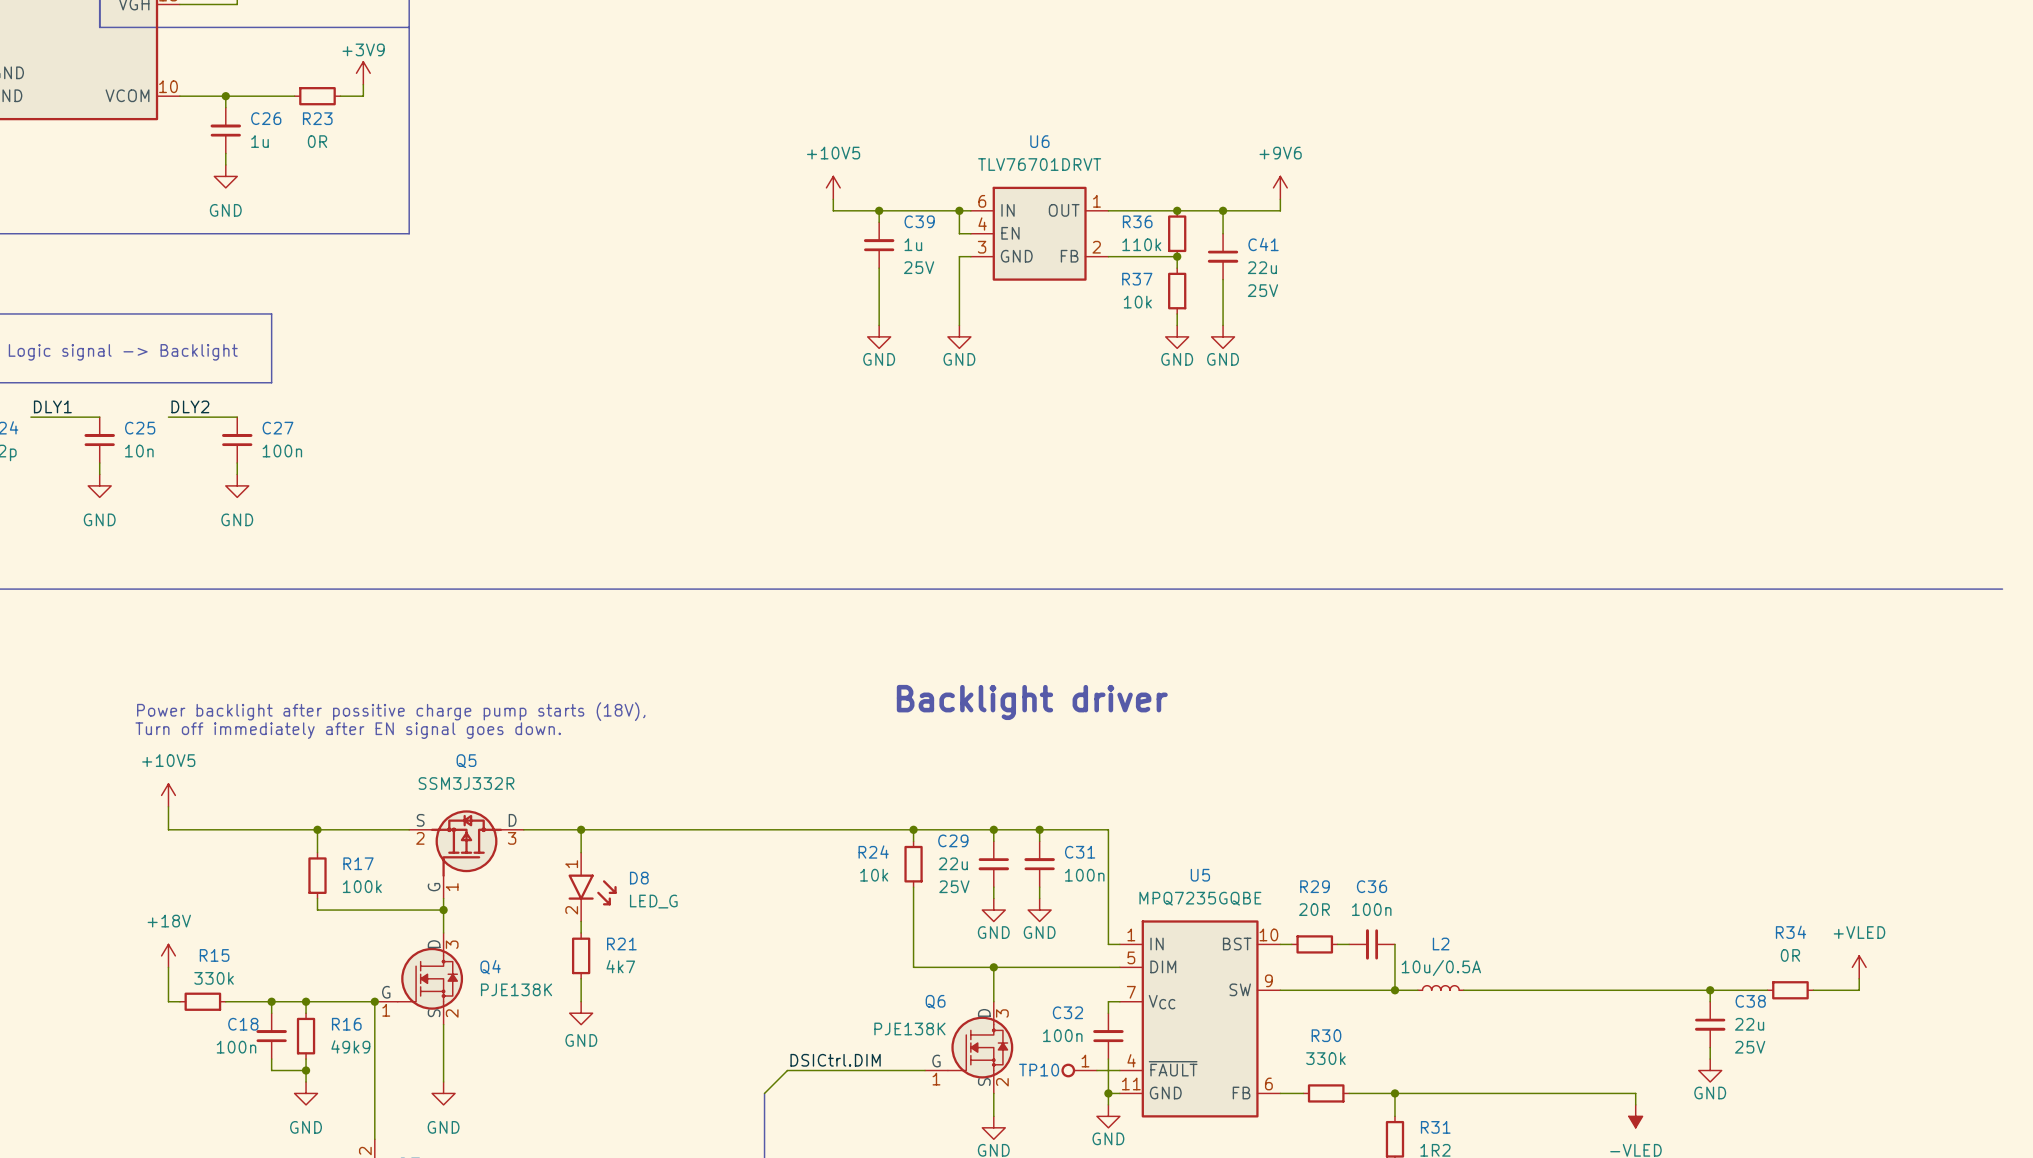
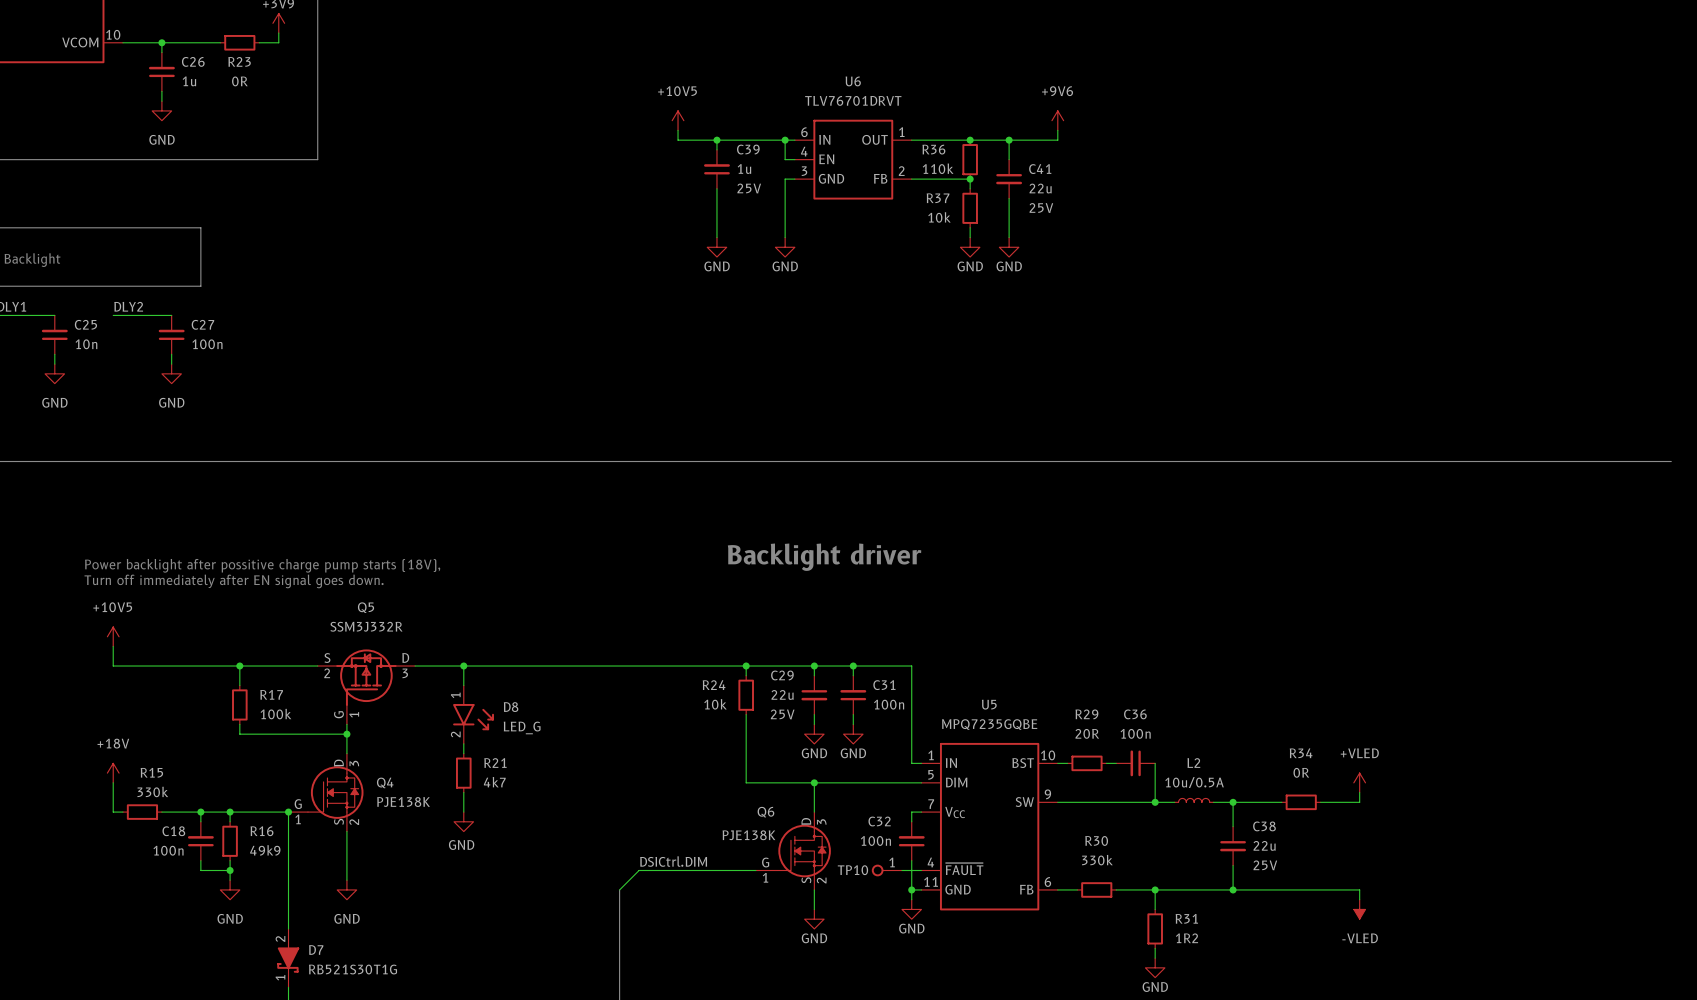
power symbol position: +VLED (1859, 967) -> +VLED (1359, 782)
wire: (1859, 978) (1859, 990) (1813, 990) -> none
wire: none -> (1233, 802) (1233, 826)
junction: none -> (1233, 802)
wire: (1544, 990) (1589, 990) -> none
wire: (1635, 990) (1767, 990) -> (1359, 802) (1359, 792)
wire: (1710, 990) (1710, 1001) -> none
junction: (1710, 990) -> none
R34 position: (1790, 990) -> (1301, 802)
C38 position: (1710, 1024) -> (1233, 846)
wire: (1710, 1047) (1710, 1059) -> none
wire: none -> (1233, 865) (1233, 889)
power symbol: GND (1710, 1070) -> none
junction: none -> (1233, 889)

